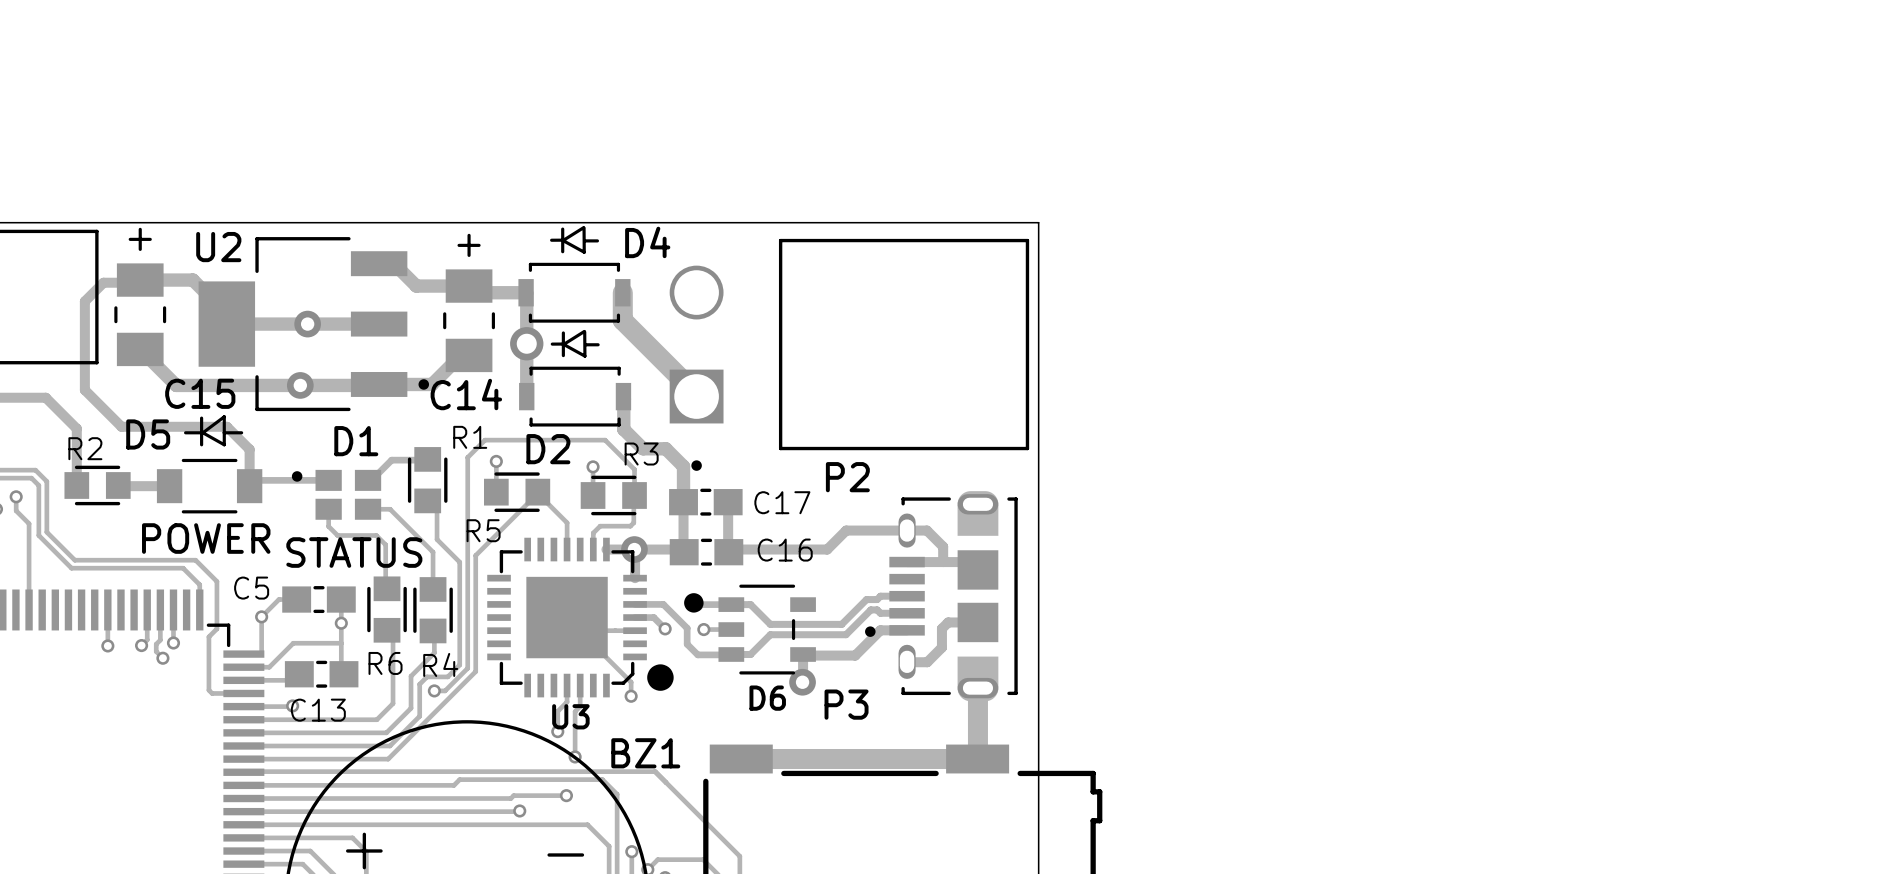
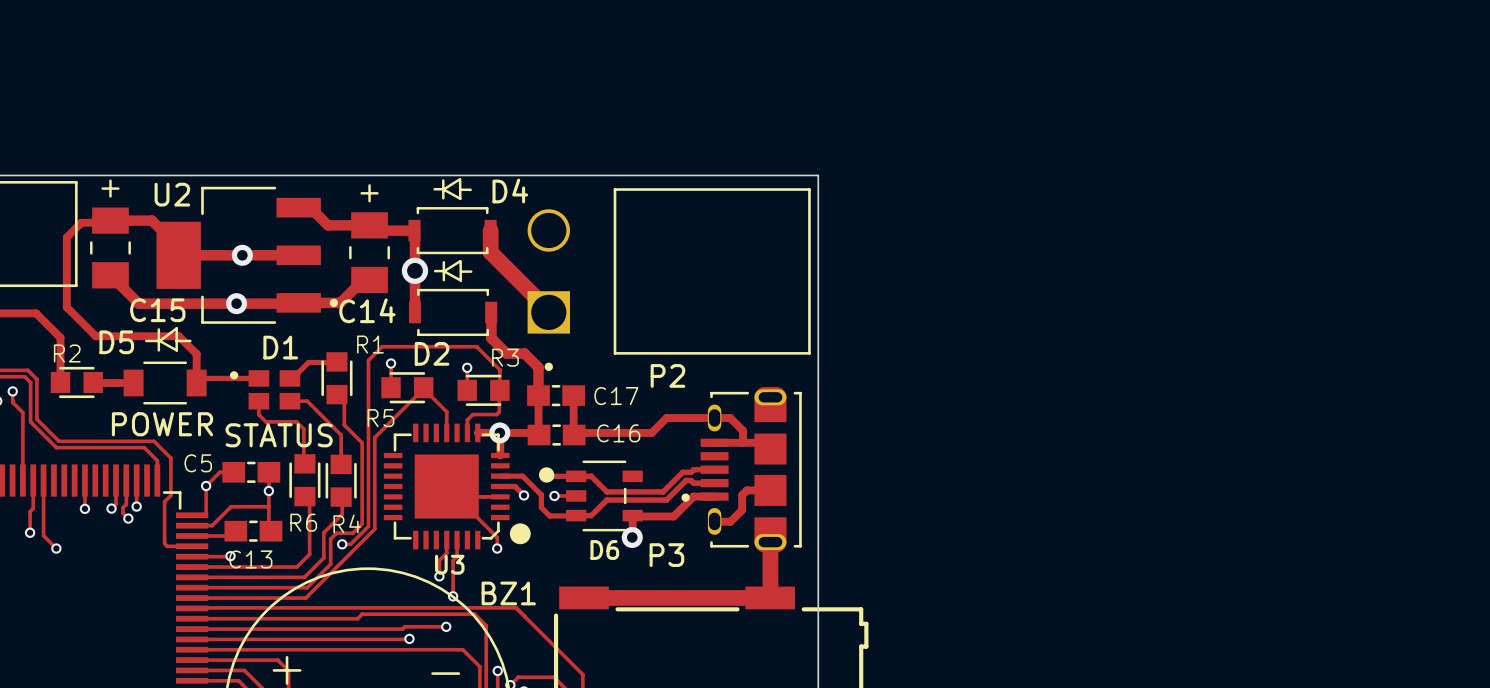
track: none -> (33, 480) (33, 508) (30, 511) (30, 532)
track: none -> (43, 480) (43, 535) (56, 548)
via: none -> (30, 532)
via: none -> (56, 548)

